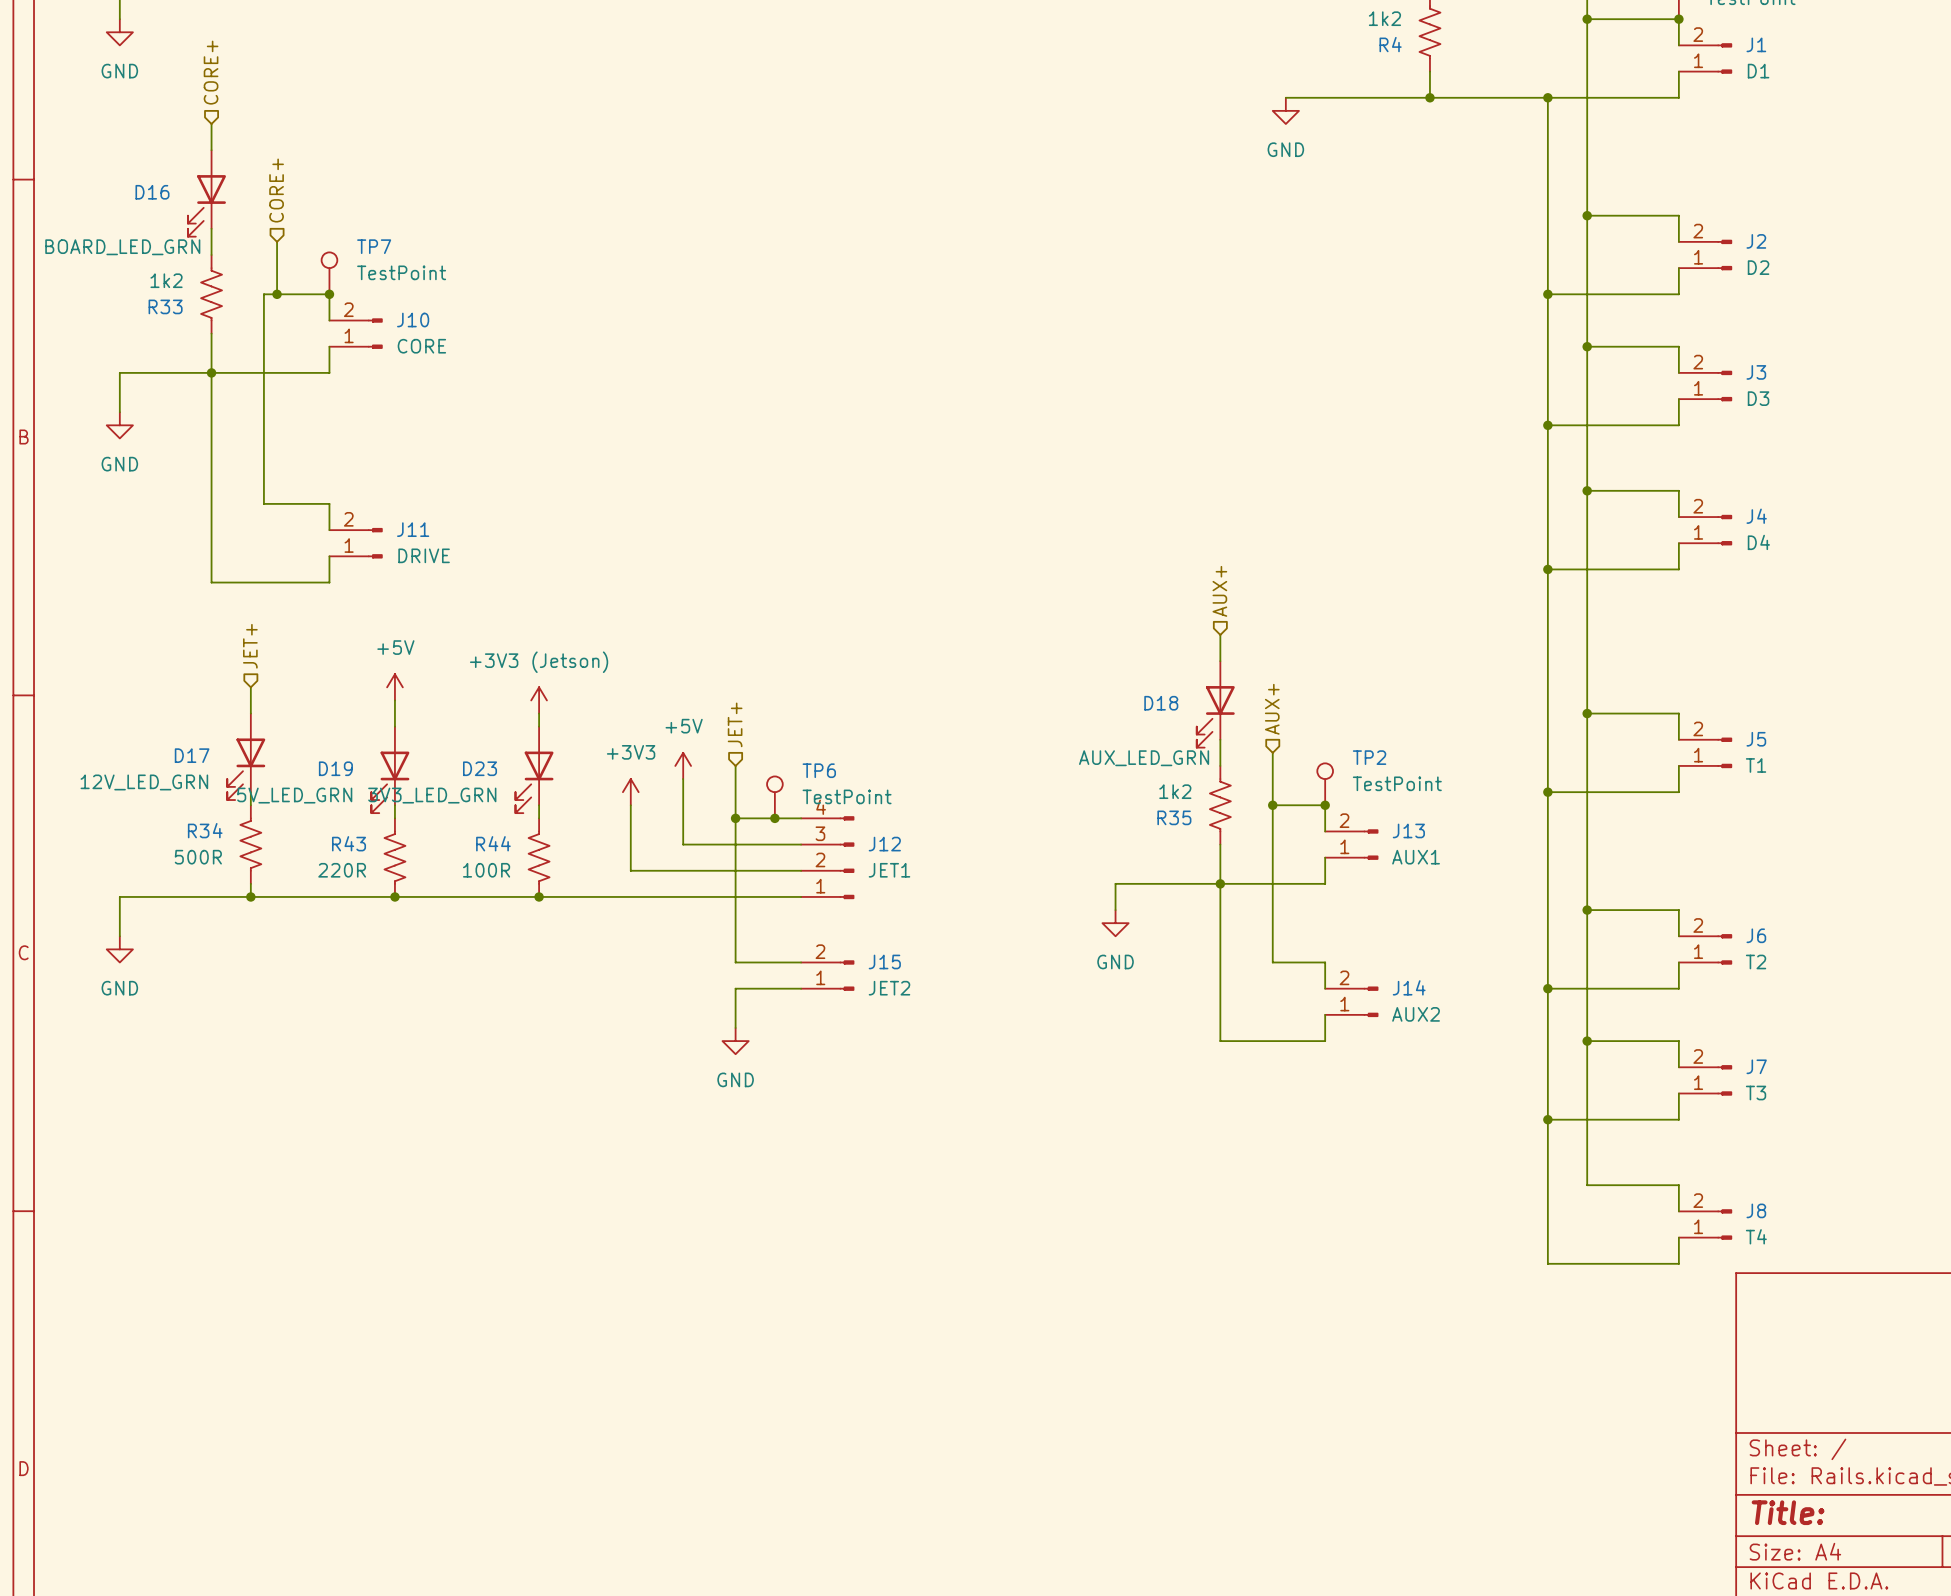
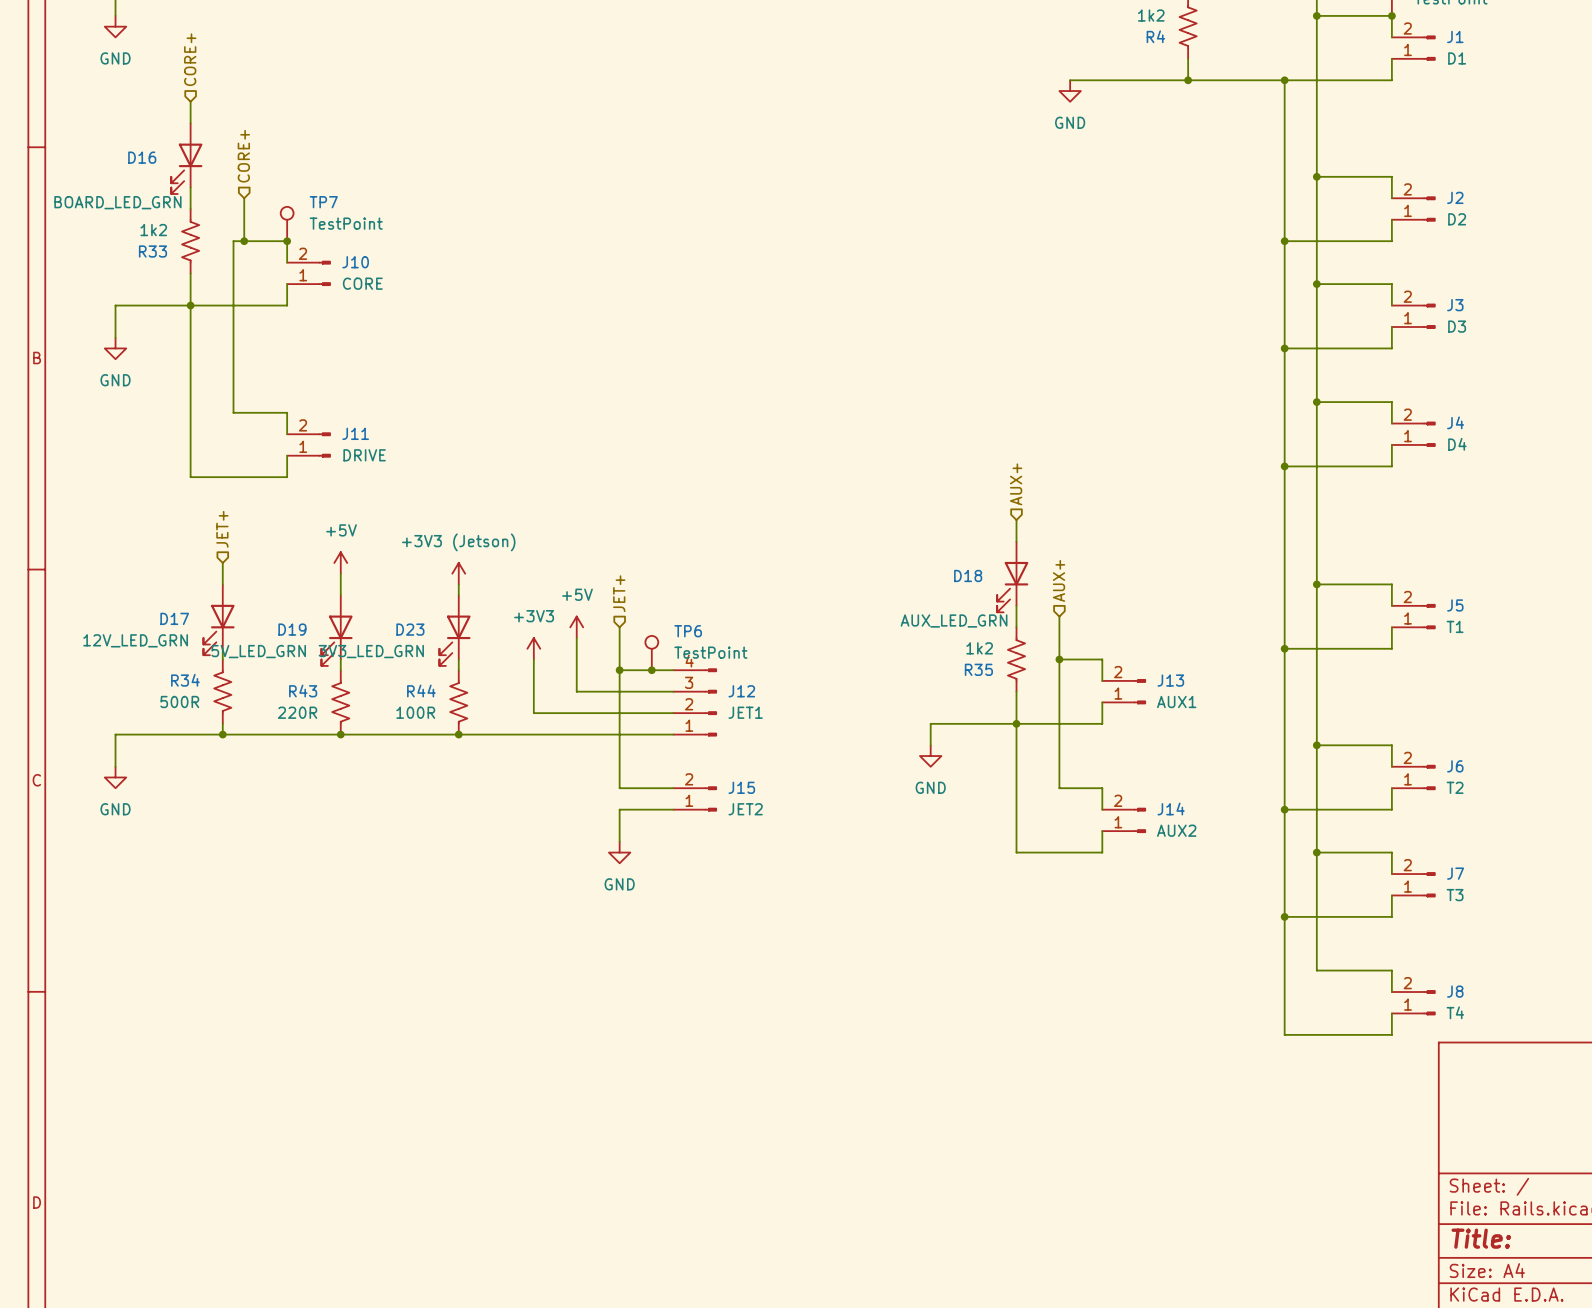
TP2: TestPoint (1325, 784) -> none
junction: (1325, 805) -> none

